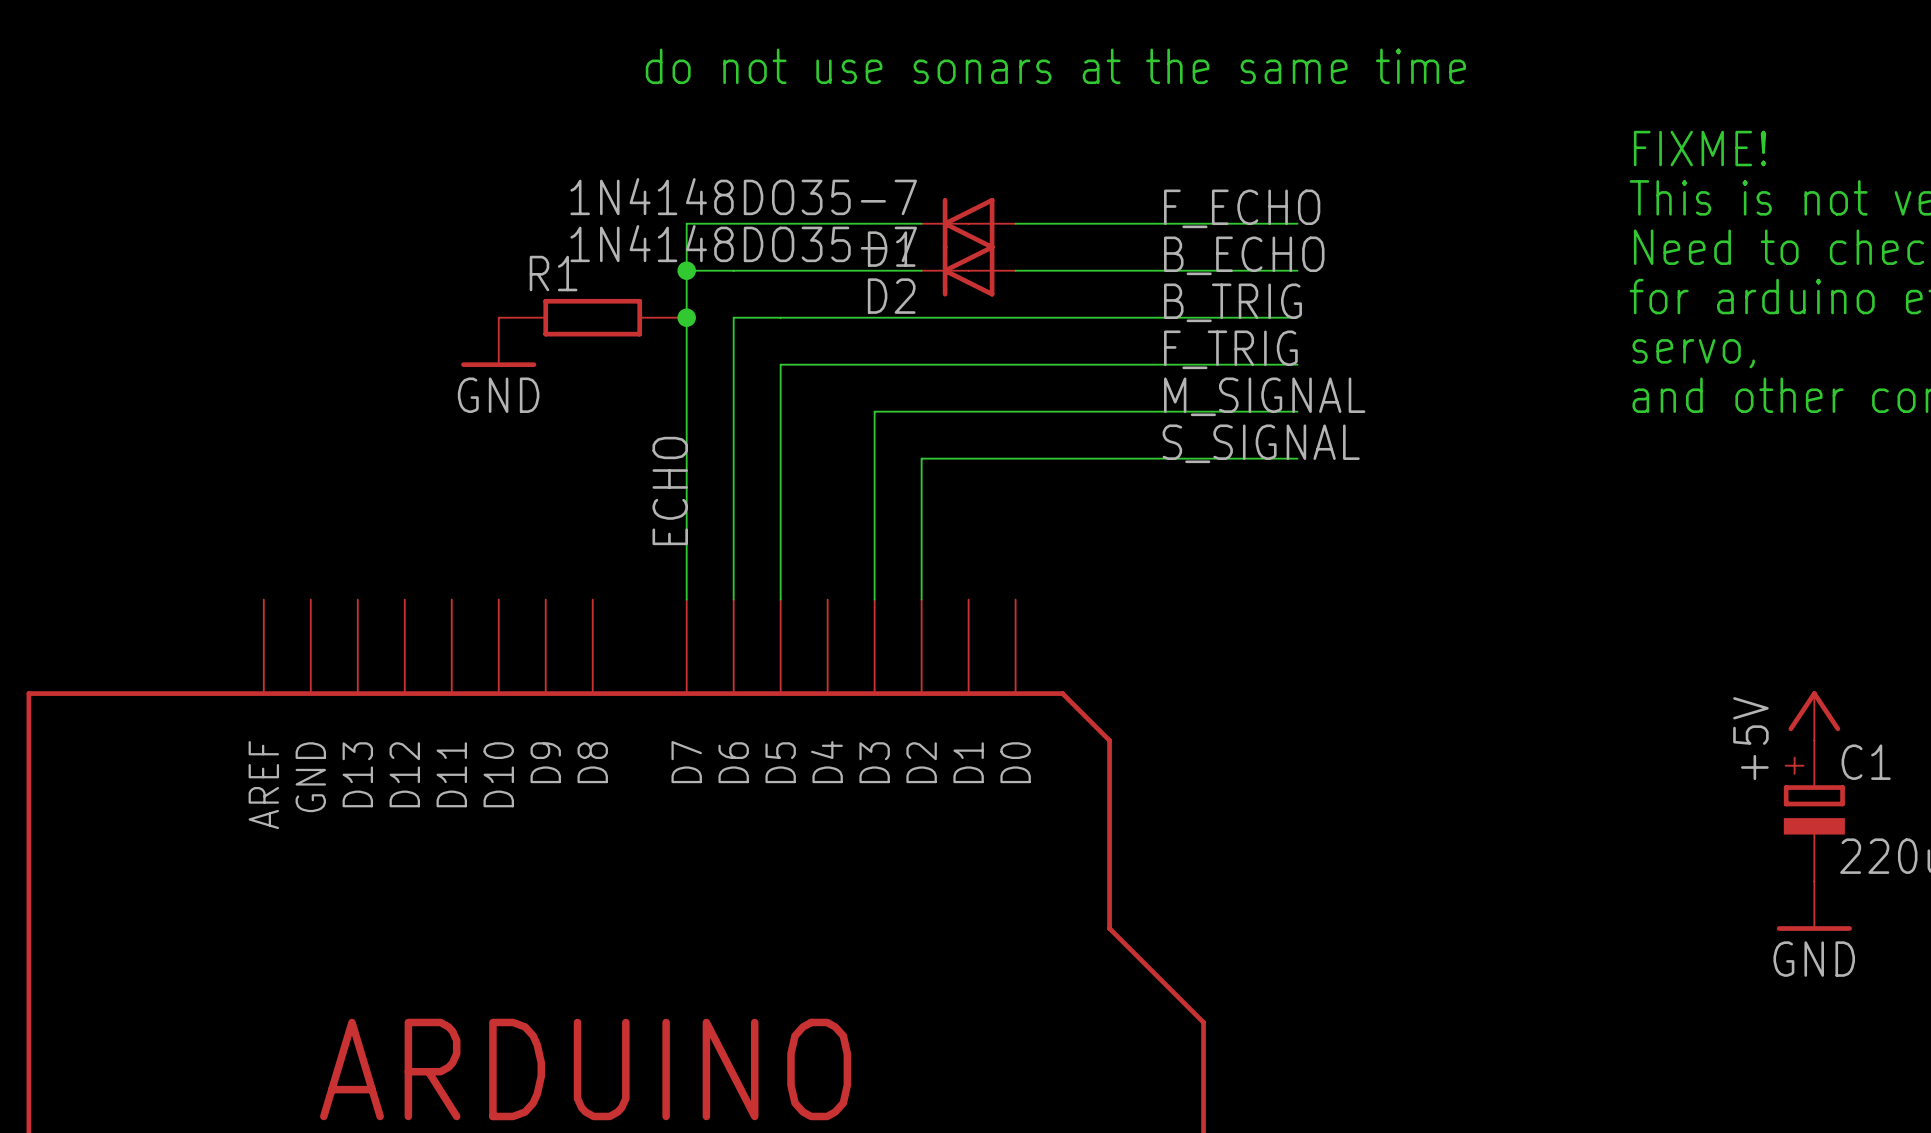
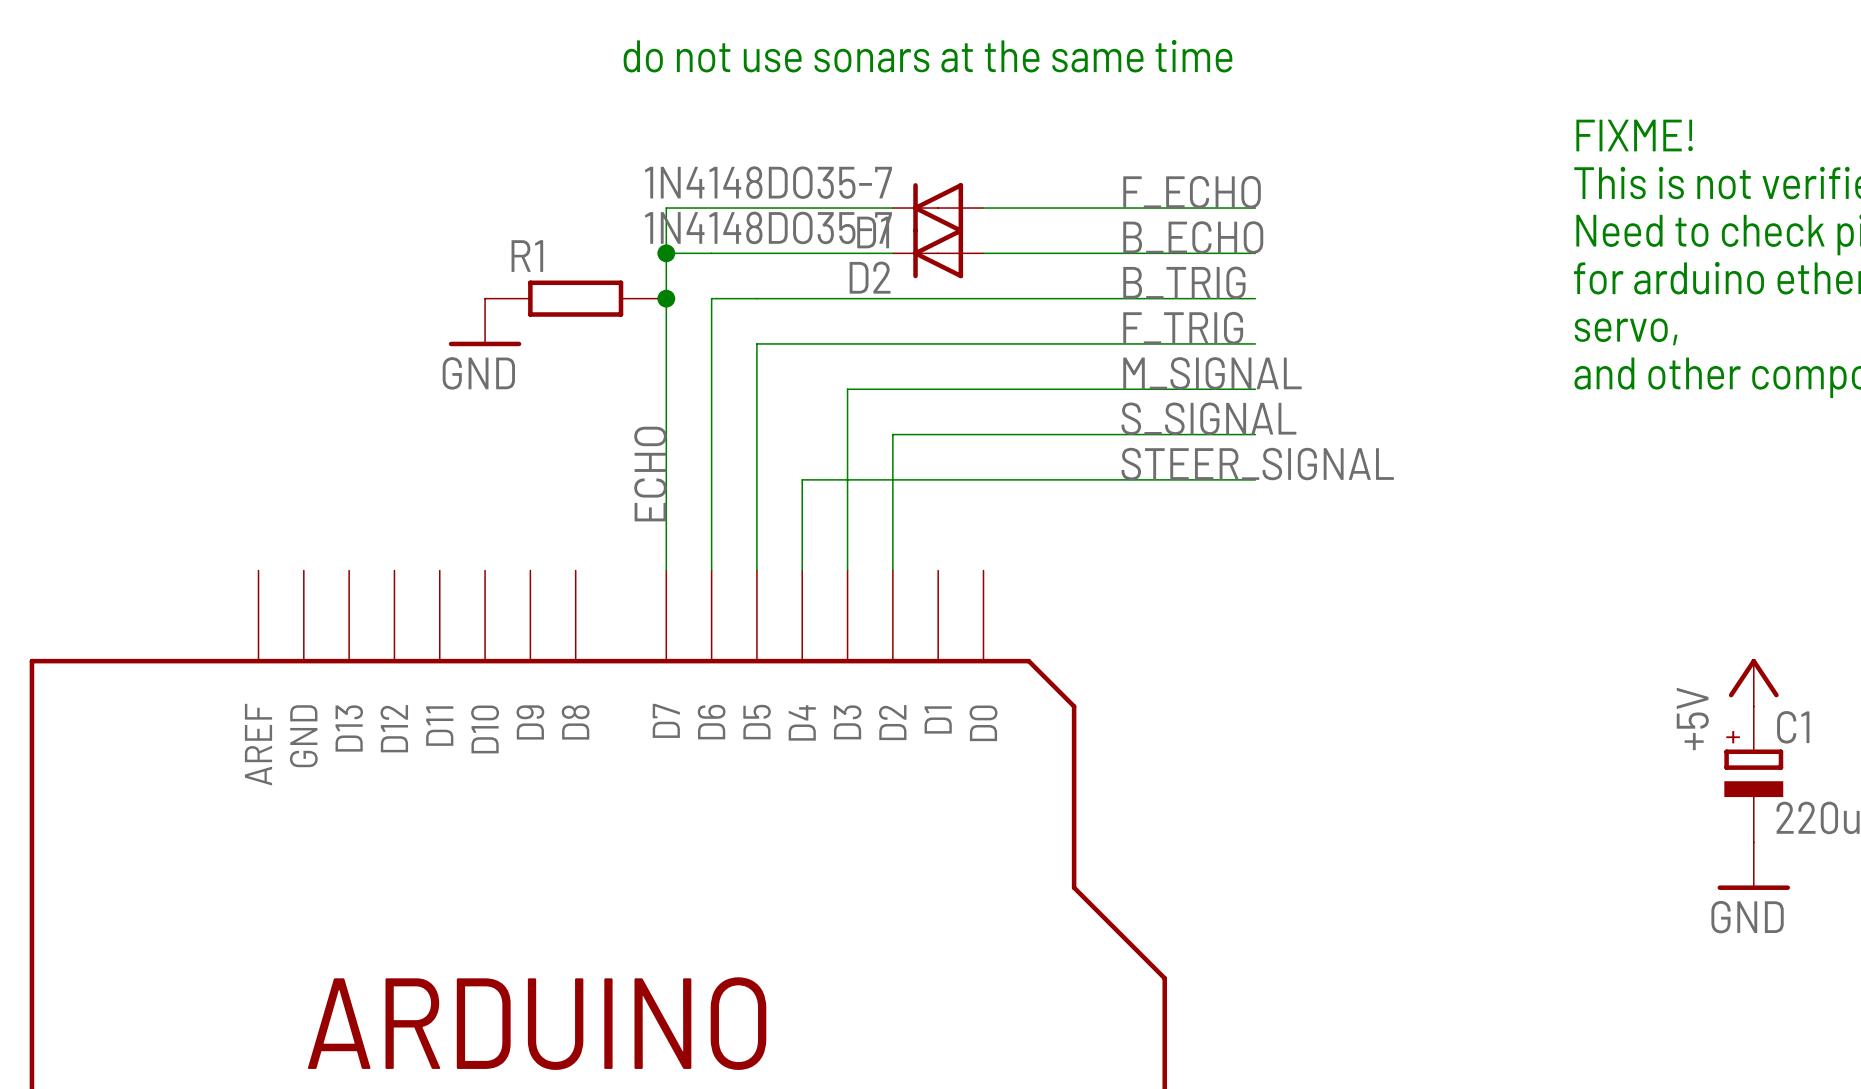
label: none -> STEER_SIGNAL (1257, 464)
wire: none -> (1255, 479) (802, 479) (802, 570)

